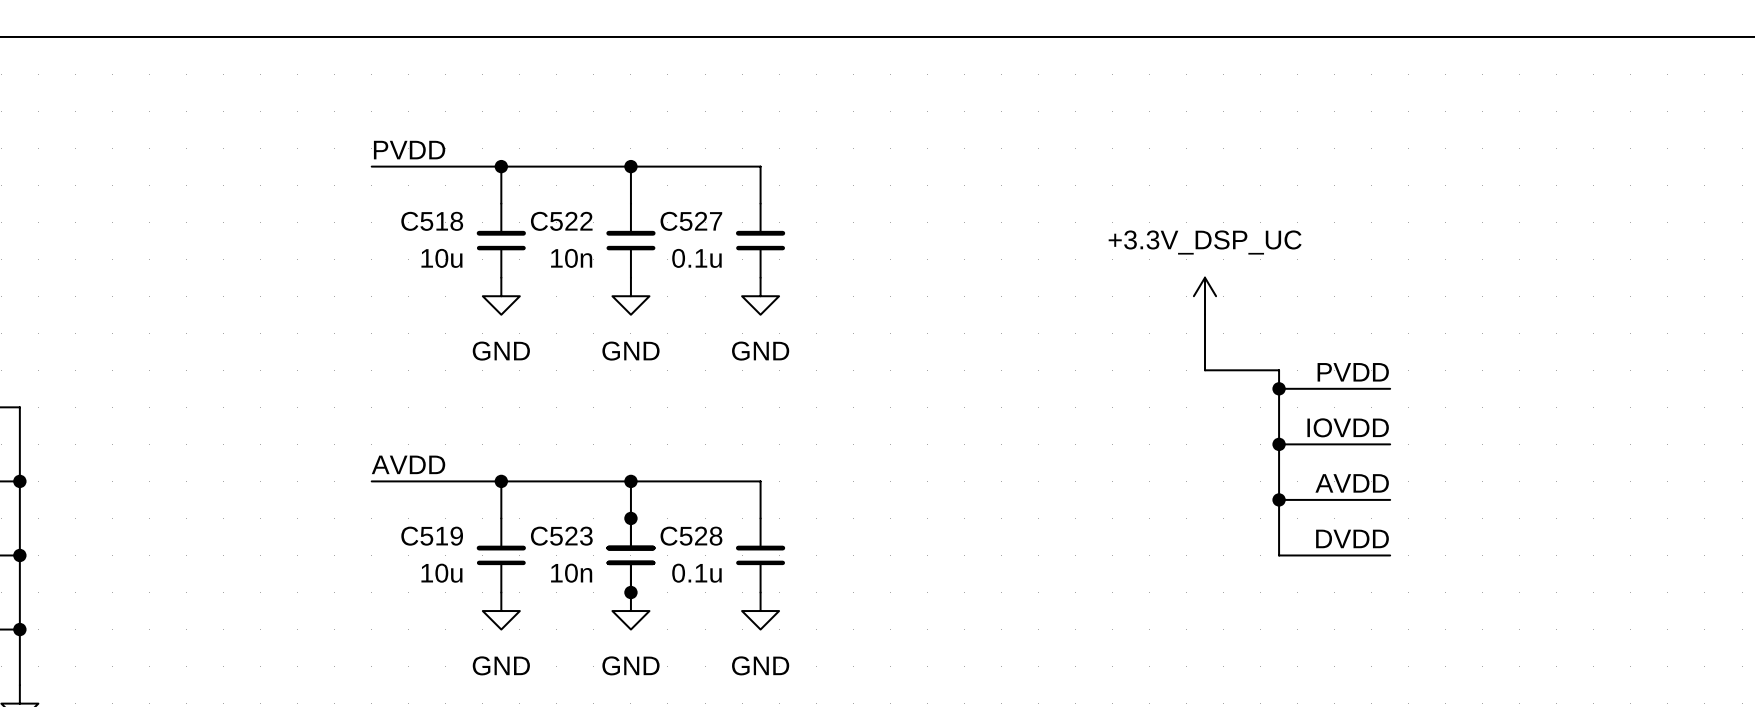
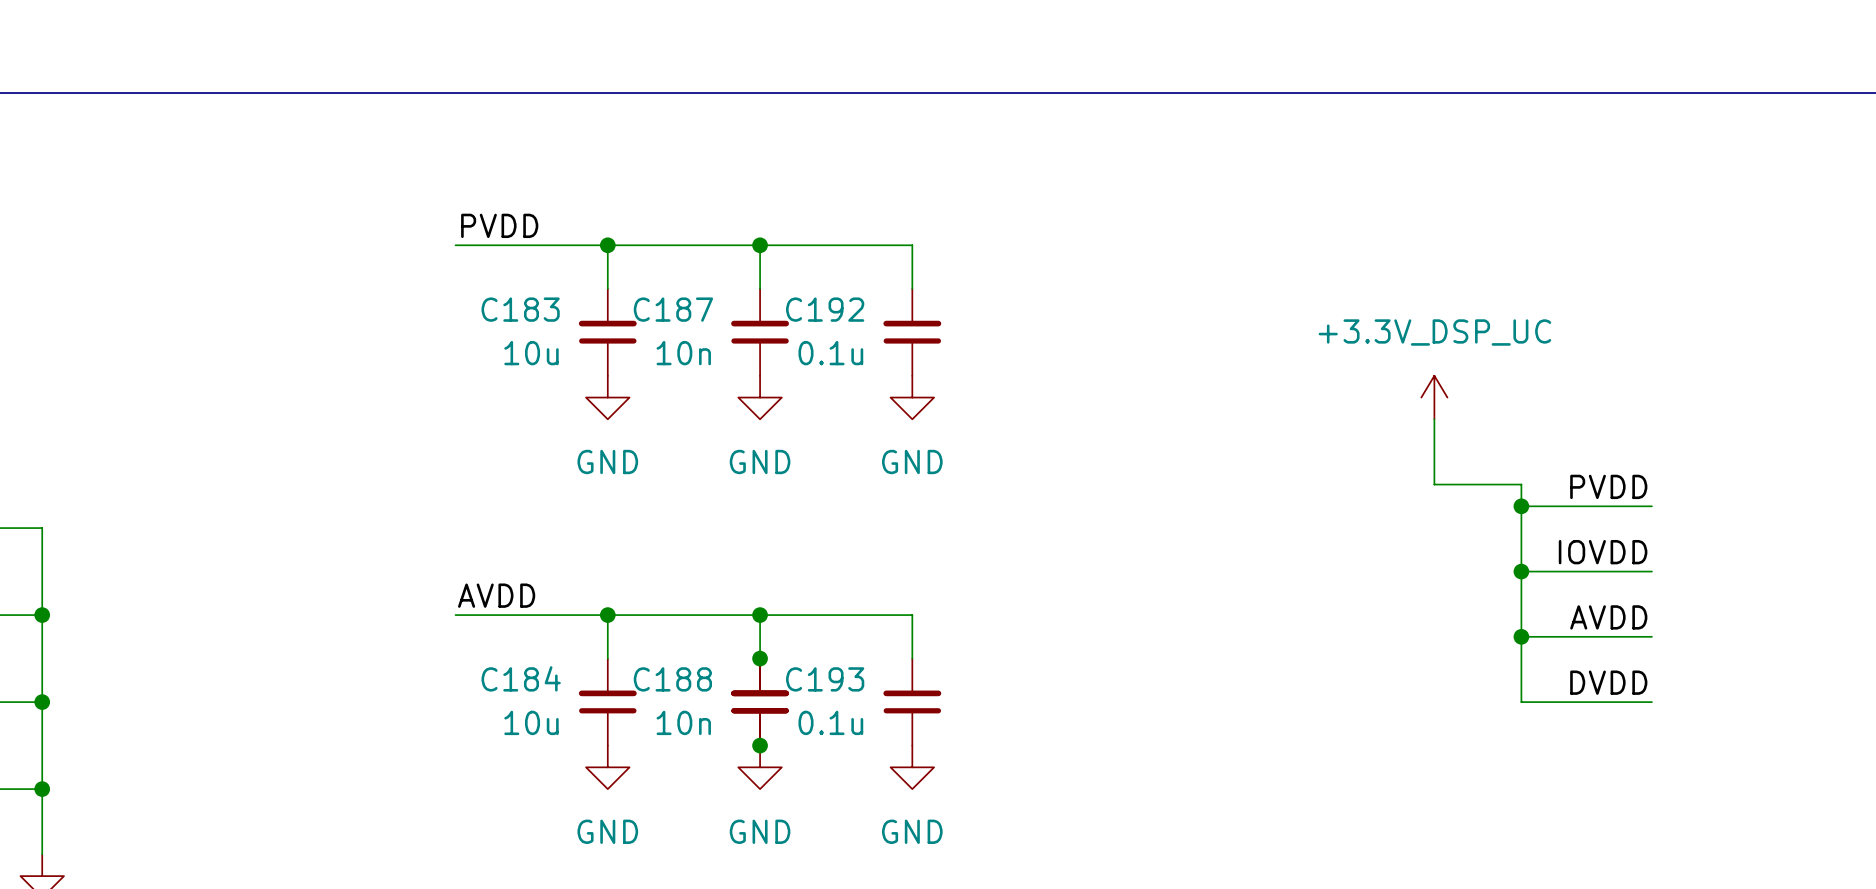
C518 name: C518 (432, 221) -> C183 (520, 309)
C522 name: C522 (561, 221) -> C187 (673, 309)
C527 name: C527 (691, 221) -> C192 (825, 309)
C519 name: C519 (432, 536) -> C184 (521, 678)
C523 name: C523 (561, 536) -> C188 (672, 679)
C528 name: C528 (691, 536) -> C193 (825, 679)

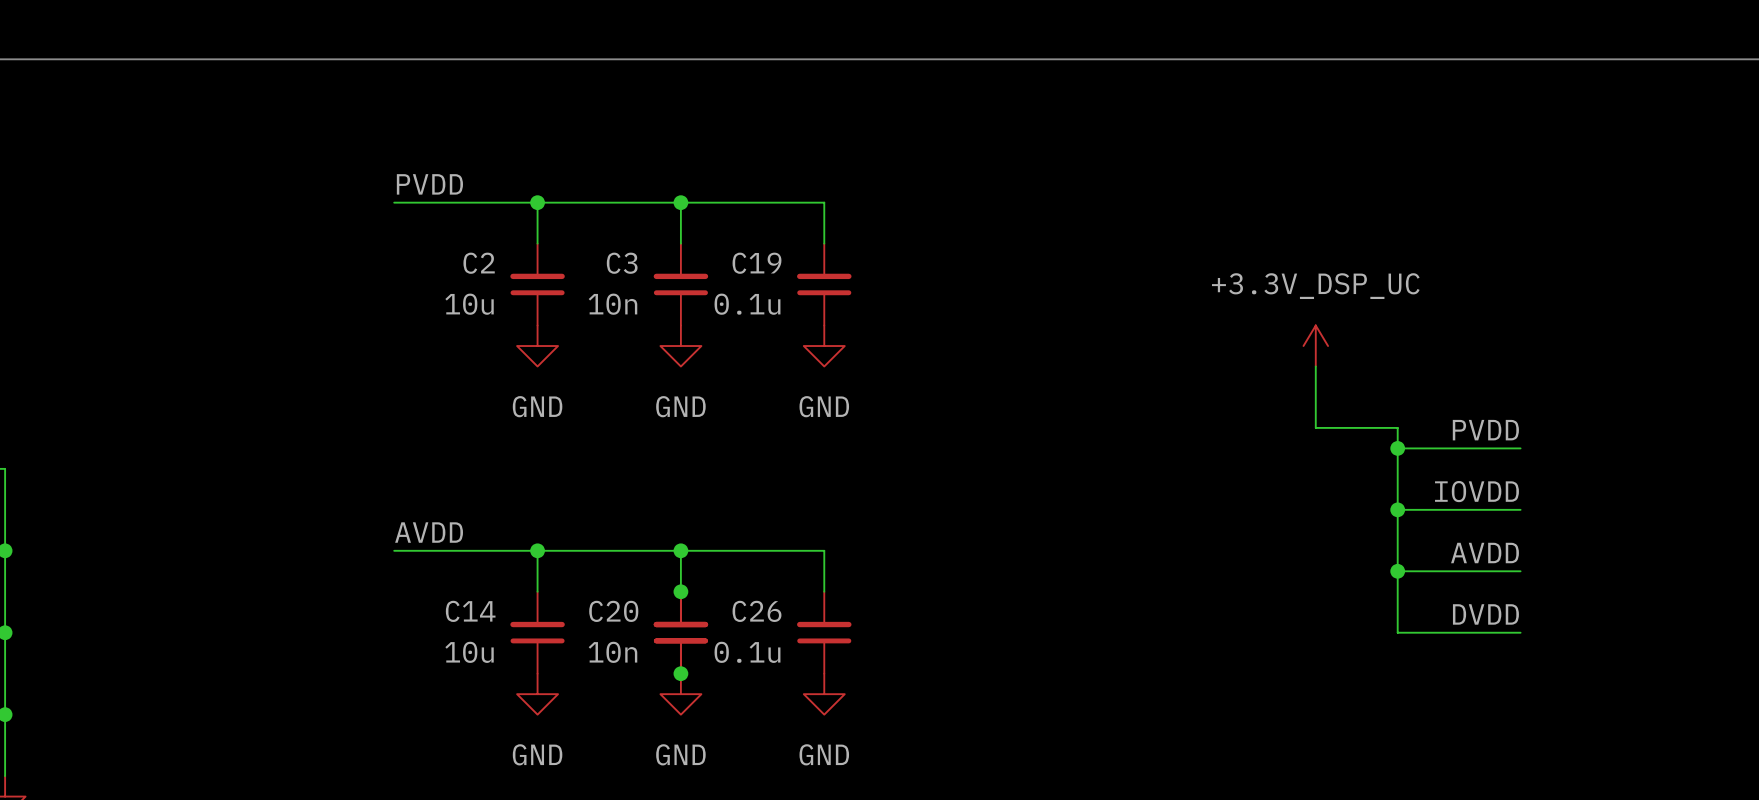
C183 name: C183 (520, 309) -> C2 (479, 263)
C187 name: C187 (673, 309) -> C3 (622, 263)
C192 name: C192 (825, 309) -> C19 (757, 263)
C184 name: C184 (521, 678) -> C14 (470, 611)
C188 name: C188 (672, 679) -> C20 (613, 611)
C193 name: C193 (825, 679) -> C26 (757, 611)

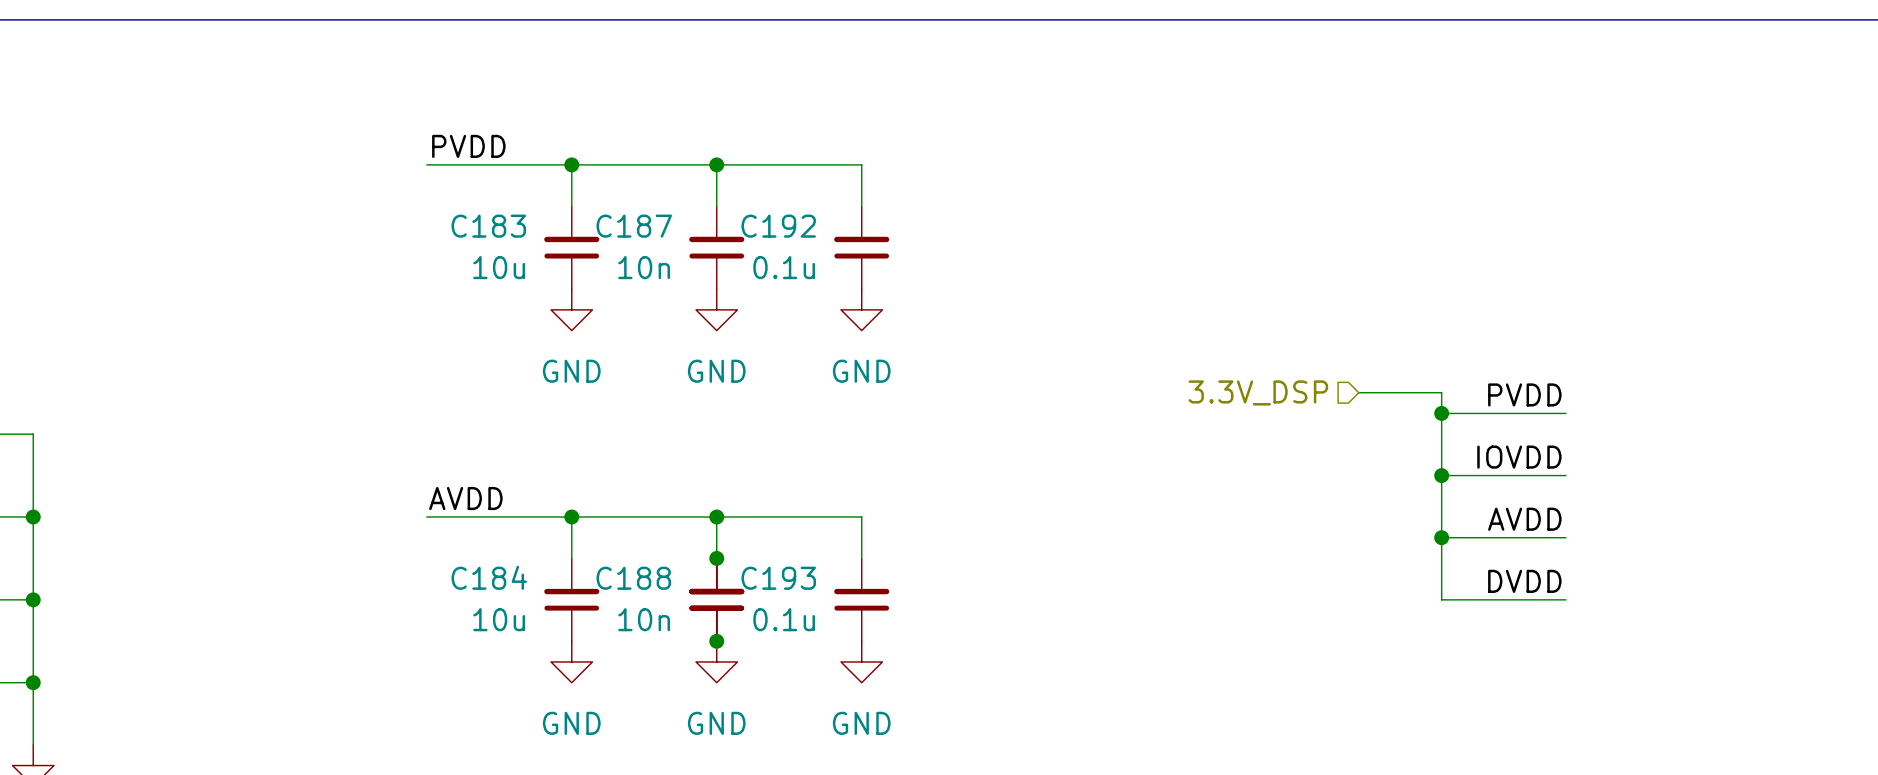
C2 name: C2 (479, 263) -> C183 (488, 226)
C3 name: C3 (622, 263) -> C187 (634, 226)
C19 name: C19 (757, 263) -> C192 (778, 226)
power symbol: +3.3V_DSP_UC (1315, 346) -> none
wire: (1315, 366) (1315, 427) -> none
hierarchical label: none -> 3.3V_DSP (1258, 392)
C14 name: C14 (470, 611) -> C184 (489, 577)
C20 name: C20 (613, 611) -> C188 (633, 578)
C26 name: C26 (757, 611) -> C193 (778, 578)

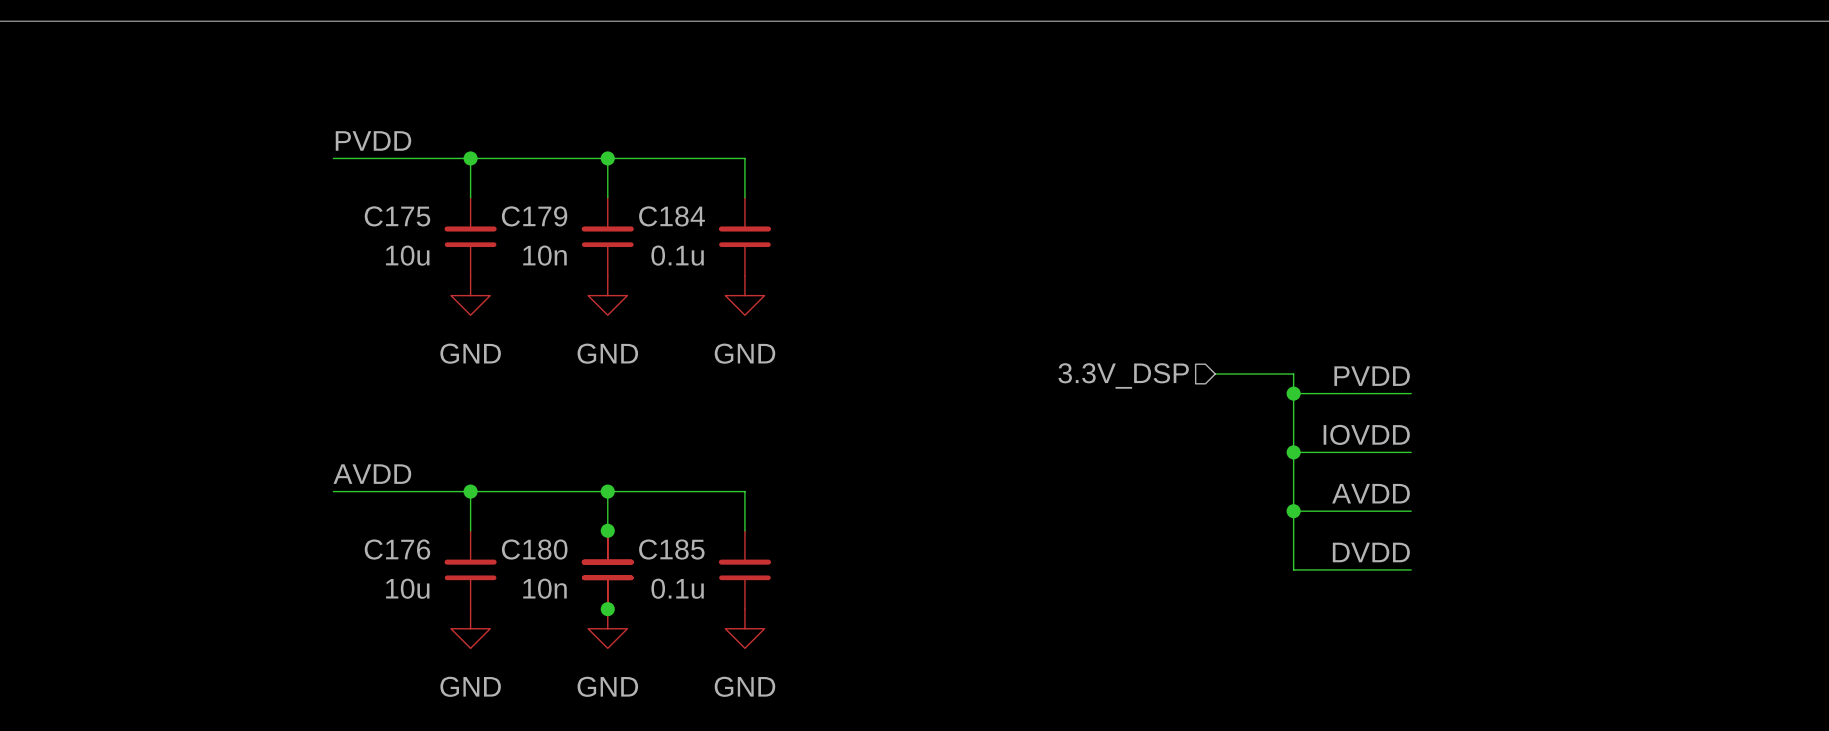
C183 name: C183 (488, 226) -> C175 (397, 216)
C187 name: C187 (634, 226) -> C179 (534, 216)
C192 name: C192 (778, 226) -> C184 (672, 216)
C184 name: C184 (489, 577) -> C176 (397, 549)
C188 name: C188 (633, 578) -> C180 (534, 549)
C193 name: C193 (778, 578) -> C185 (671, 549)

